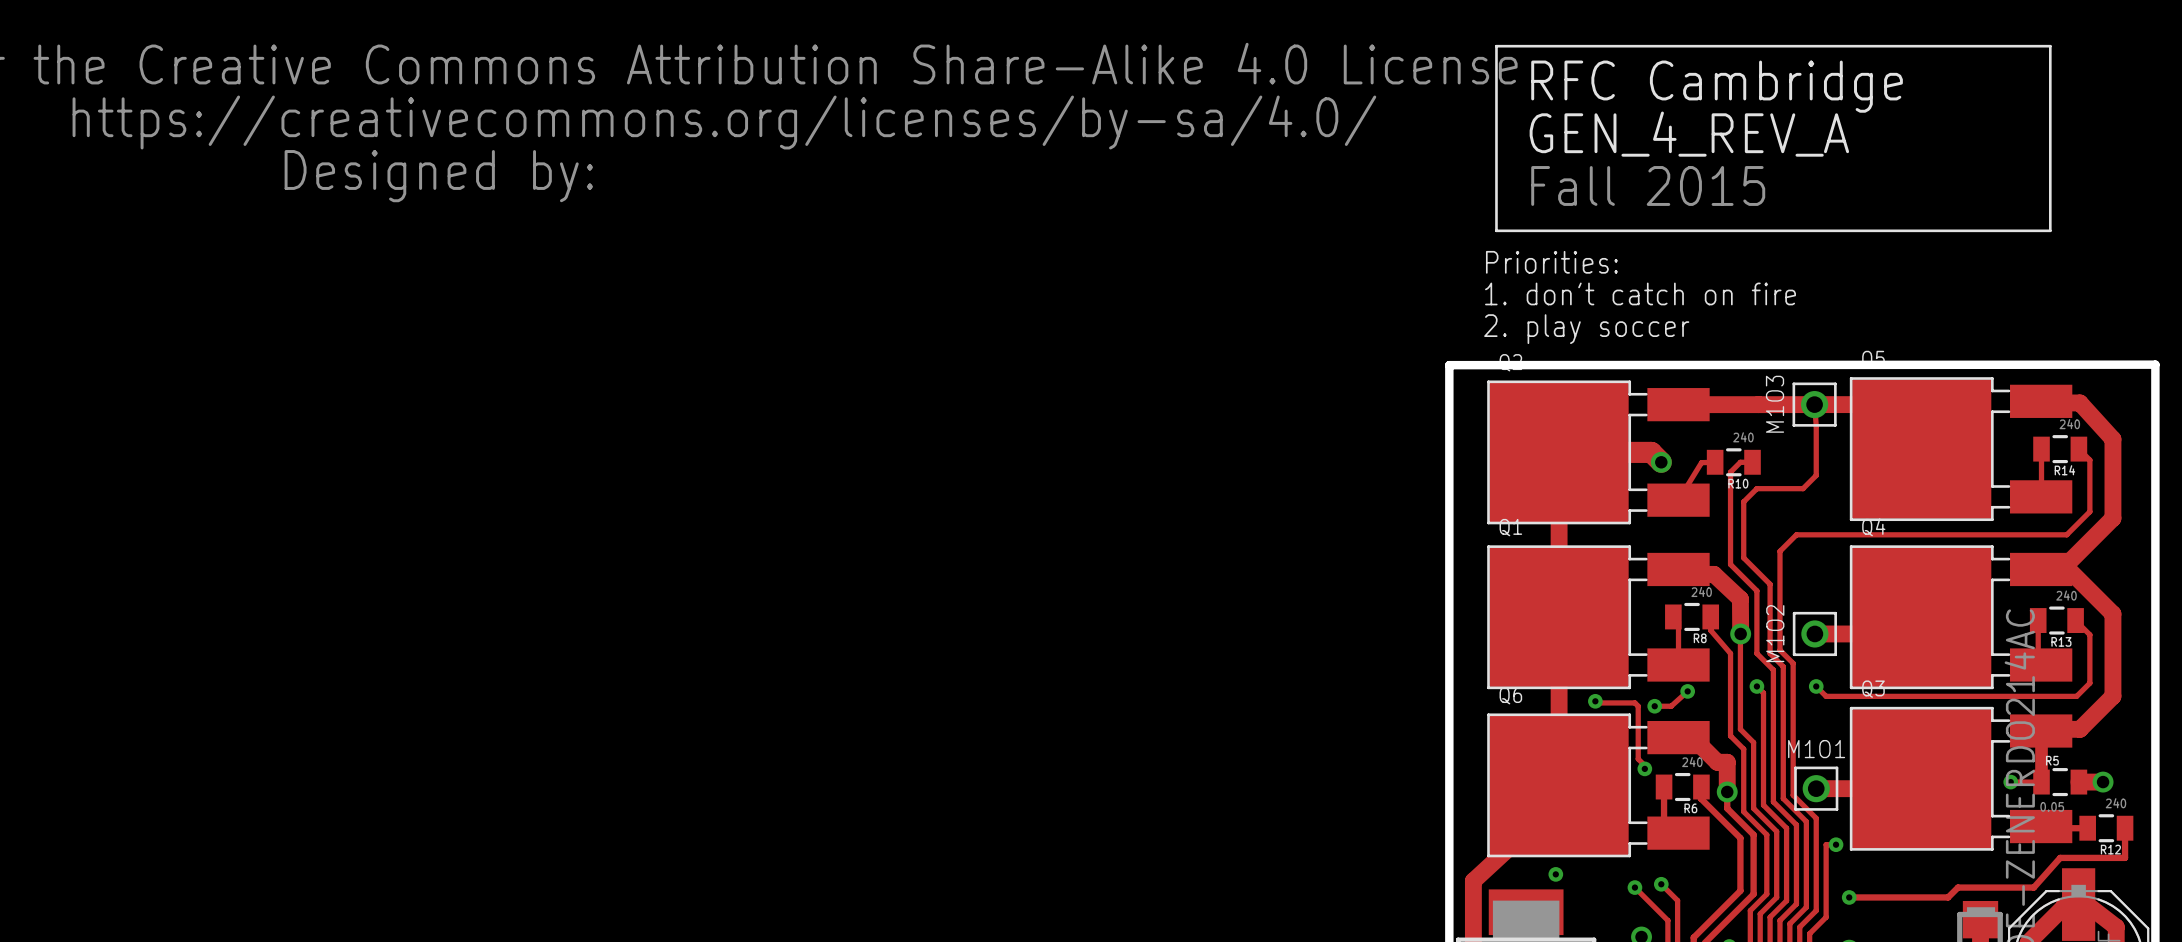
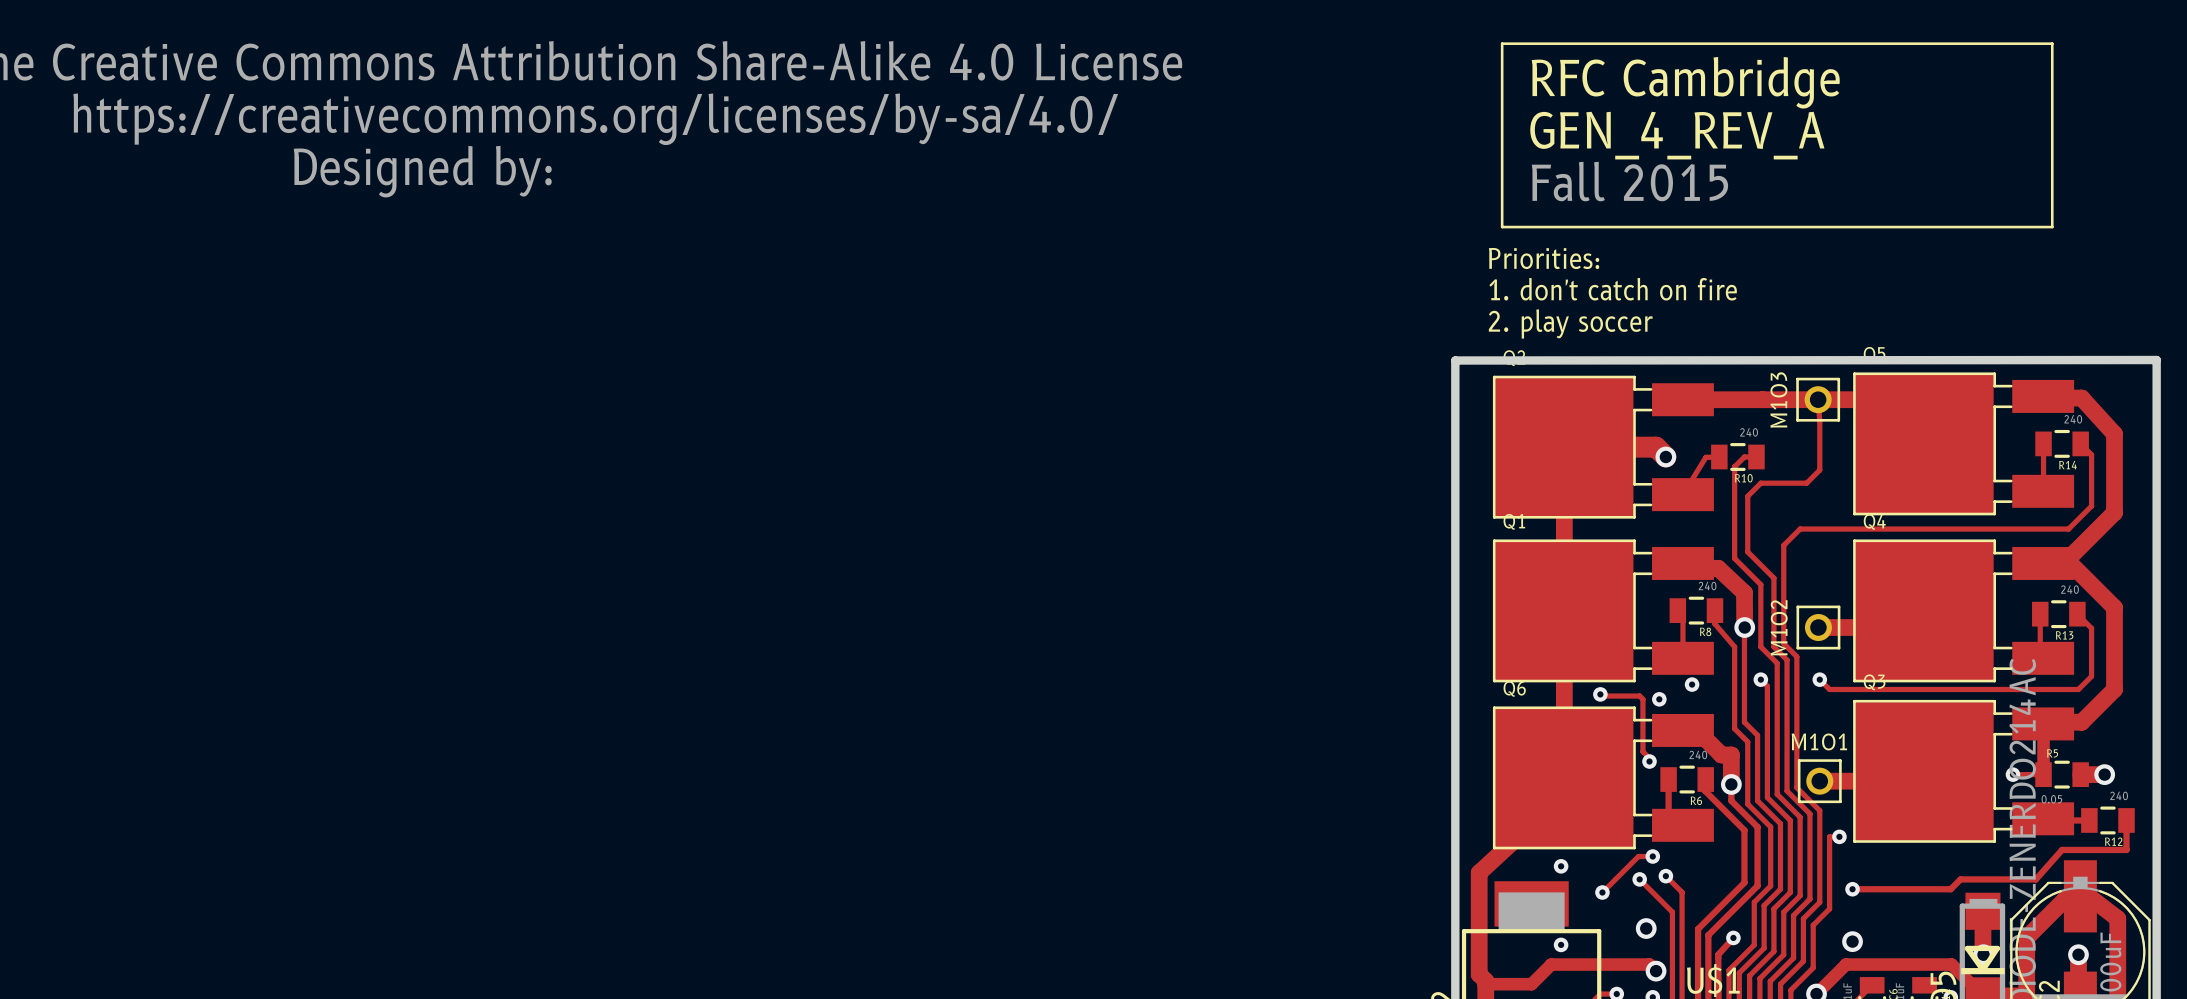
track: (1687, 691) (1671, 706) (1654, 706) -> none
track: none -> (1652, 856) (1638, 856) (1602, 892)
via: none -> (1652, 856)
via: none -> (1602, 892)

